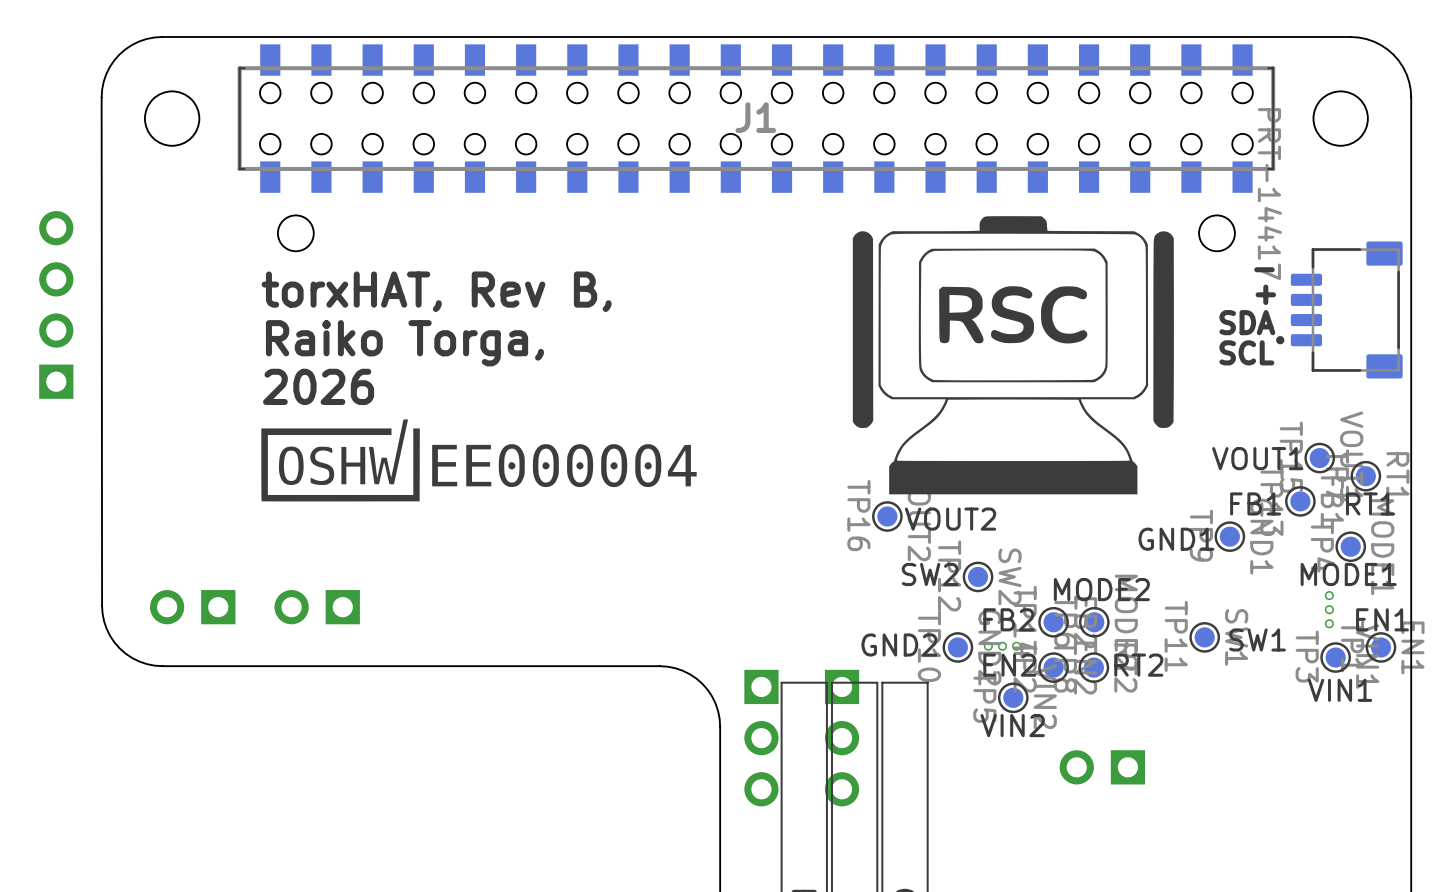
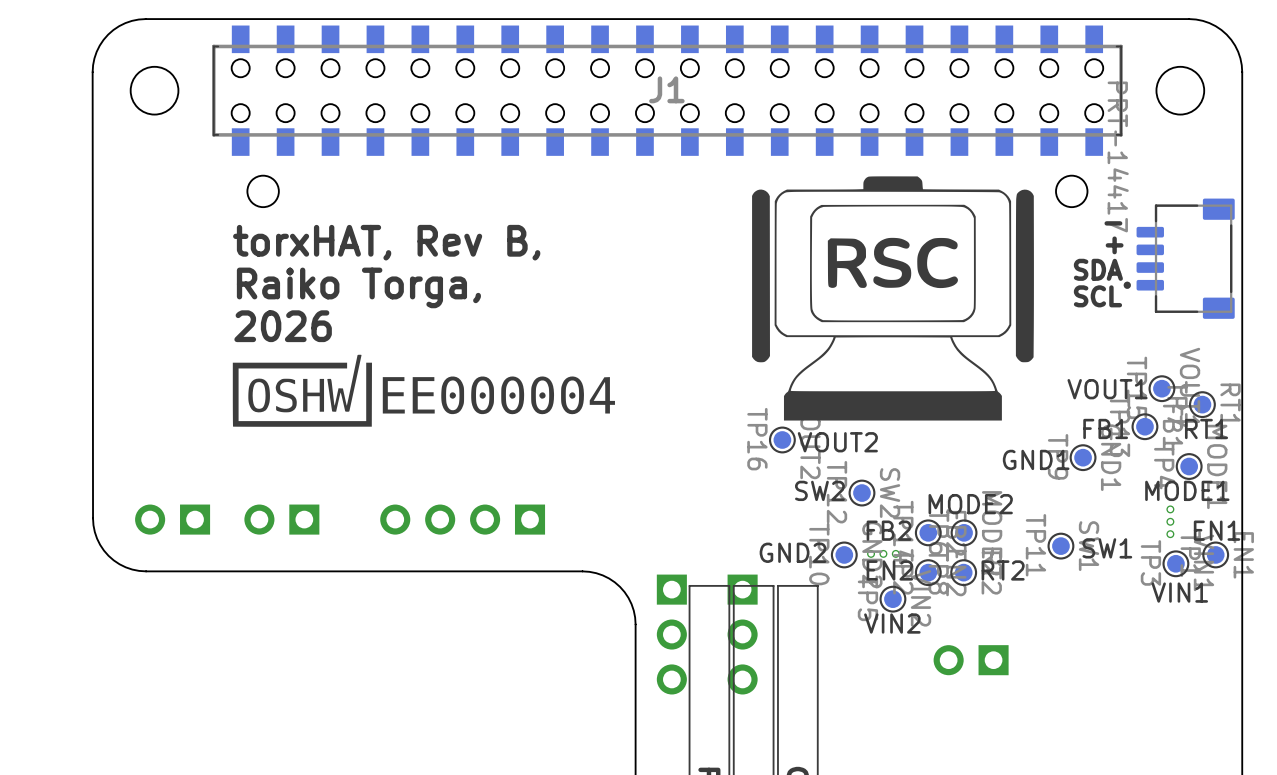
part: (56, 304) -> none
part: none -> (462, 519)

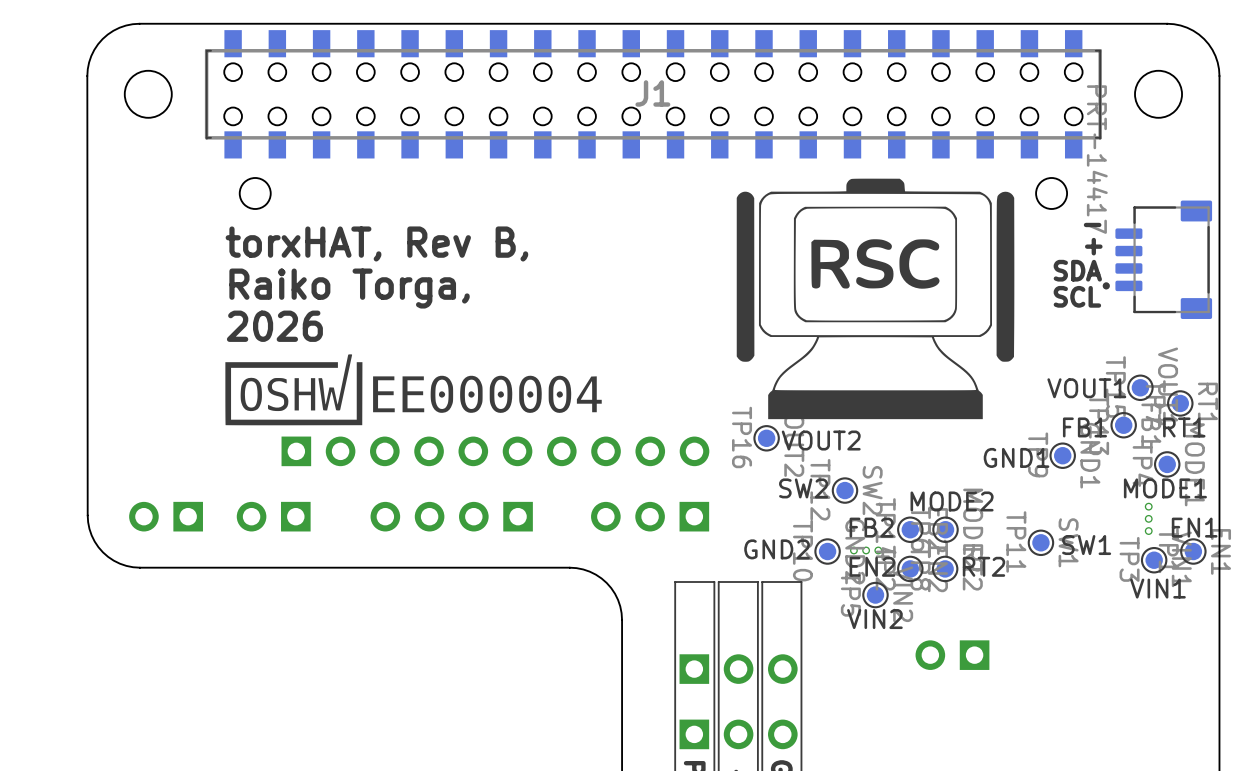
part: none -> (495, 451)
part: none -> (650, 516)
part: (671, 634) -> none
part rotation: 0° (742, 634) -> 90° counterclockwise (738, 669)
part: none -> (738, 734)

